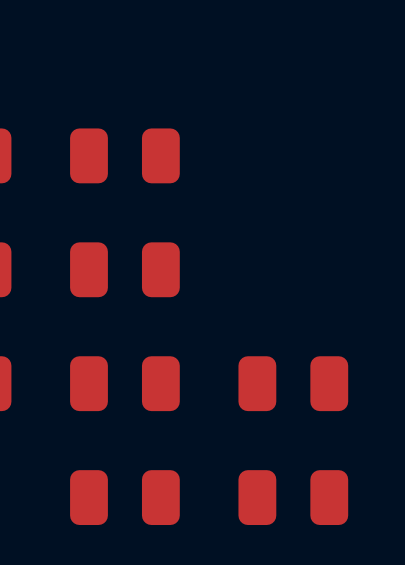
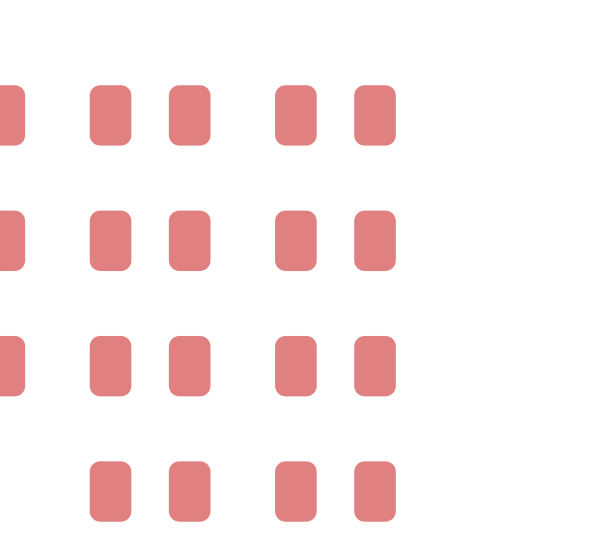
part: none -> (335, 115)
part: none -> (335, 240)

